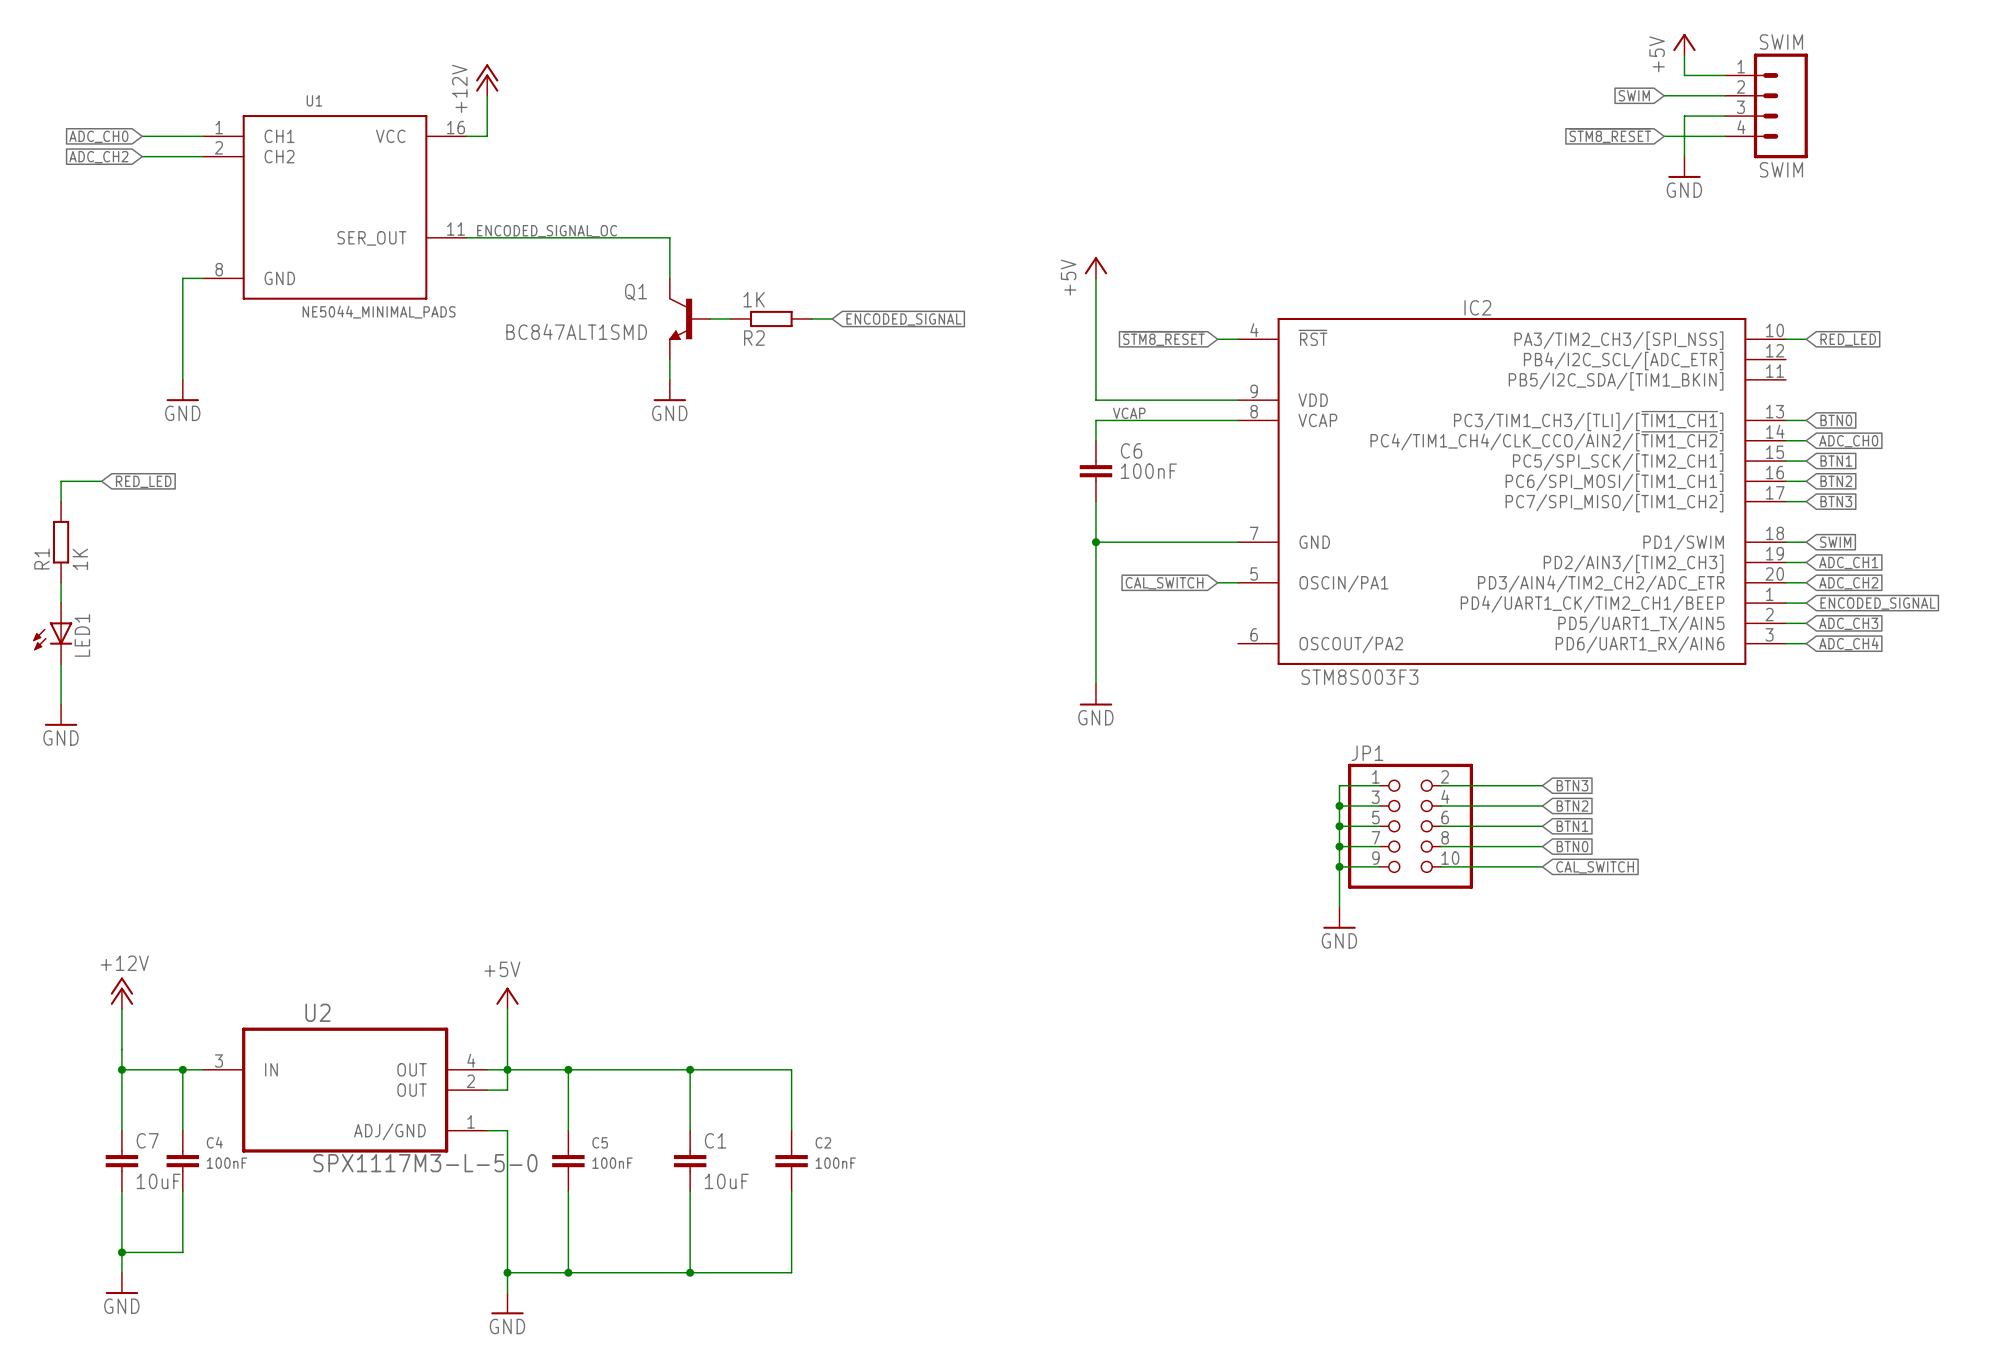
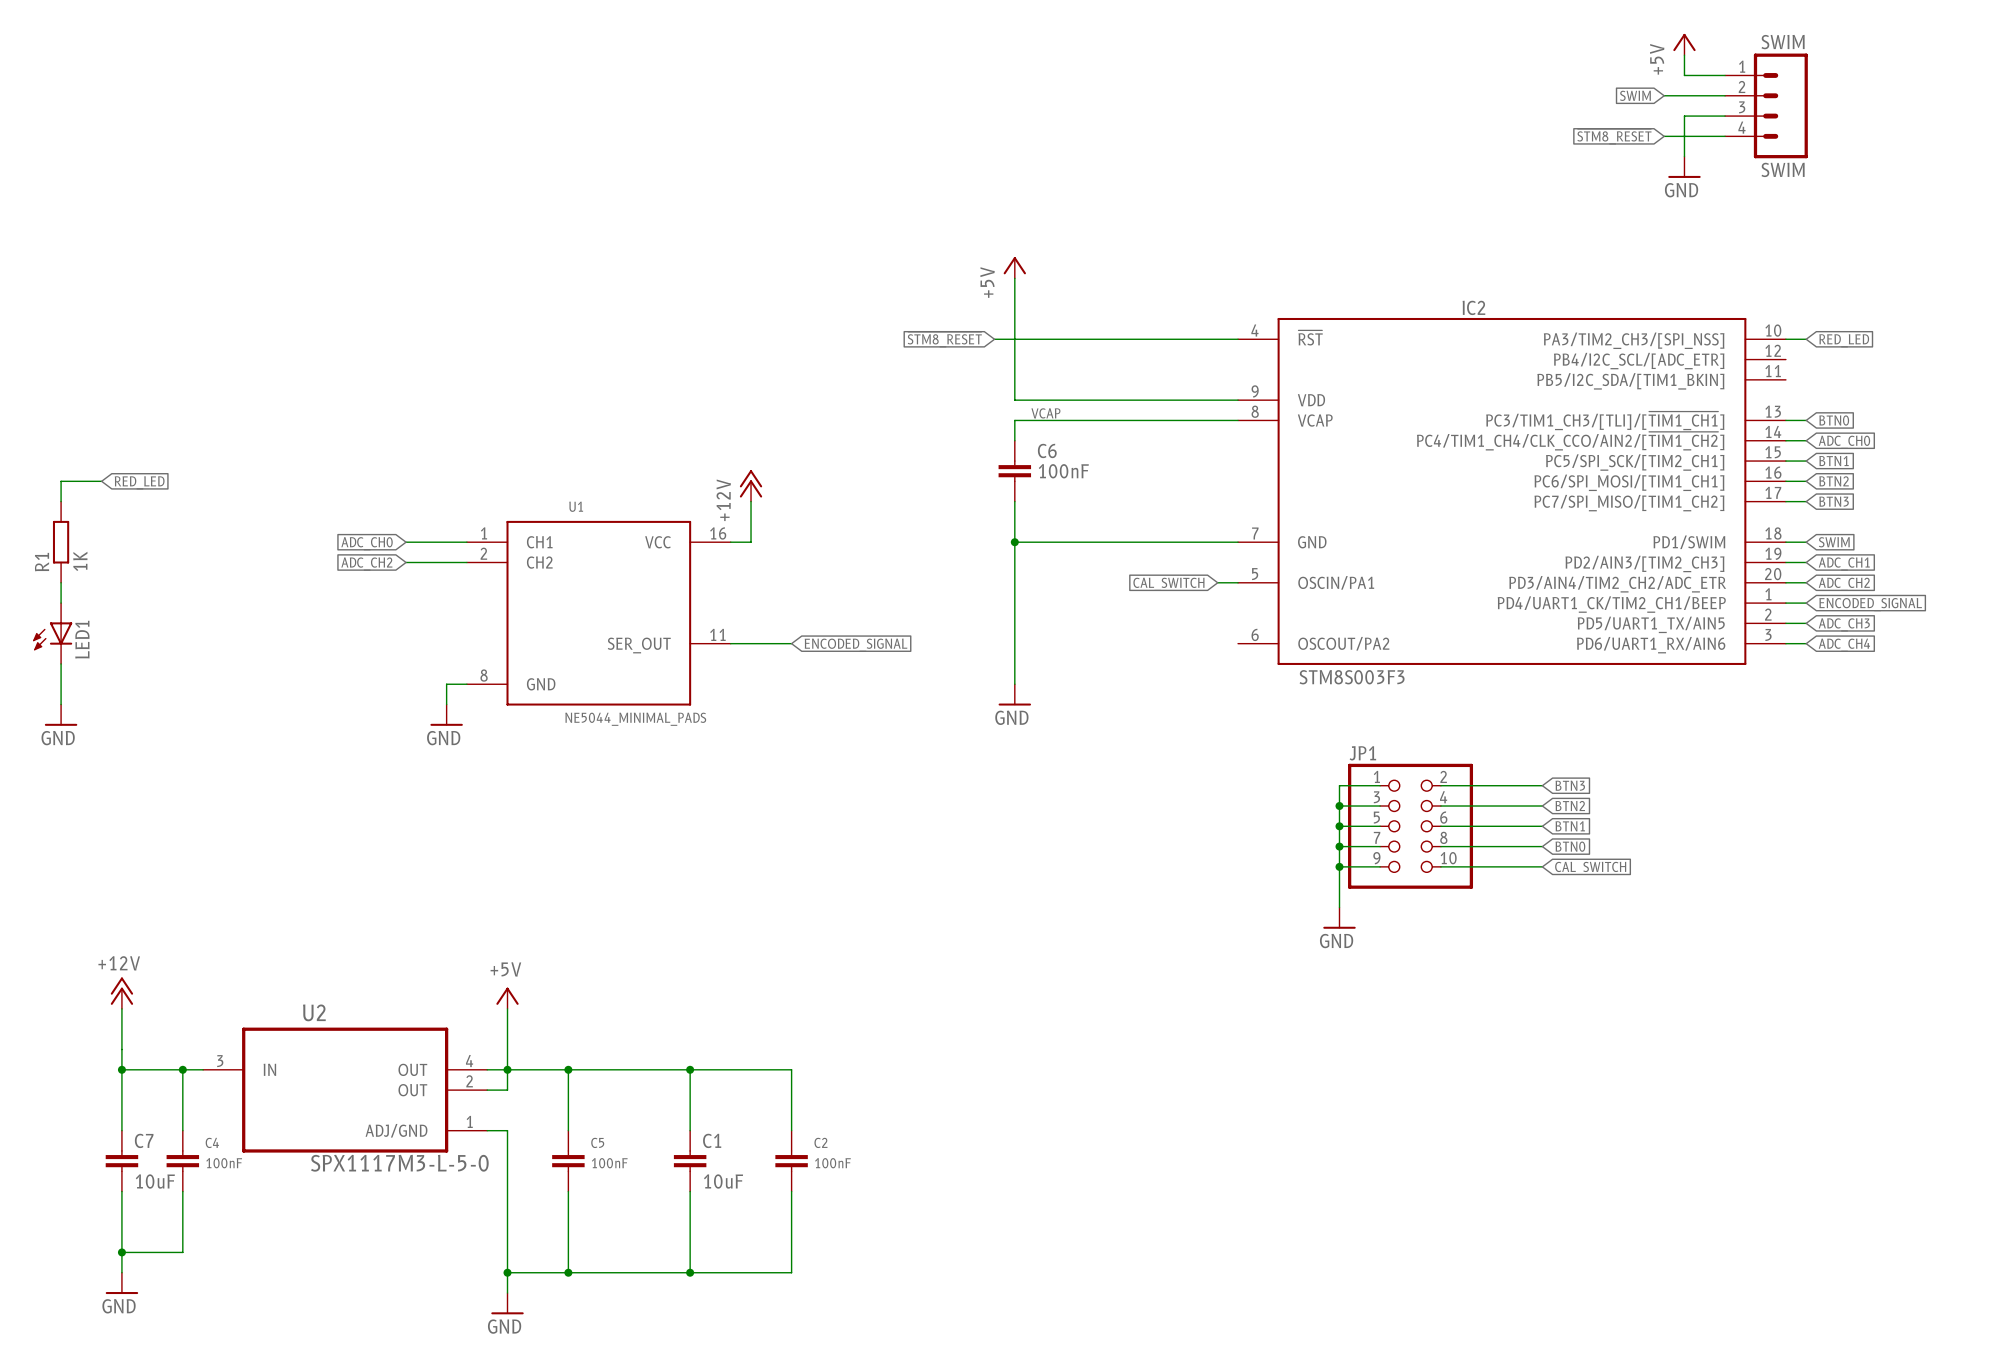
power symbol: +12V (487, 80) -> none
wire: (487, 95) (487, 136) (466, 136) -> none
global label: ADC_CH0 (98, 136) -> none
wire: (142, 136) (203, 136) -> none
wire: (142, 156) (203, 156) -> none
global label: ADC_CH2 (98, 157) -> none
U1 position: (335, 207) -> (598, 613)
label: ENCODED_SIGNAL_OC (547, 231) -> none
wire: (466, 237) (669, 237) (669, 278) -> none
power symbol position: +5V (1095, 267) -> +5V (1014, 267)
wire: (203, 278) (182, 278) (182, 379) -> none
wire: (1095, 278) (1095, 400) -> (1014, 278) (1014, 400) (1095, 400)
Q1: BC847ALT1SMD (689, 318) -> none
wire: (710, 318) (730, 318) -> none
R2: 1K (771, 318) -> none
wire: (811, 318) (832, 318) -> none
global label: ENCODED_SIGNAL (904, 319) -> none
global label: none -> ~{STM8_RESET} (944, 339)
global label: ~{STM8_RESET} (1163, 338) -> none
wire: none -> (994, 339) (1217, 339)
wire: (669, 359) (669, 379) -> none
power symbol: GND (182, 390) -> none
power symbol: GND (669, 390) -> none
label position: VCAP (1129, 413) -> VCAP (1045, 413)
wire: (1095, 420) (1095, 440) -> (1095, 420) (1014, 420) (1014, 440)
C6 position: (1095, 471) -> (1014, 471)
power symbol: none -> +12V (751, 485)
wire: none -> (751, 501) (751, 542) (730, 542)
wire: (1095, 501) (1095, 684) -> (1014, 501) (1014, 684)
global label: none -> ADC_CH0 (367, 543)
wire: none -> (406, 542) (466, 542)
wire: none -> (1014, 542) (1095, 542)
junction: none -> (1014, 542)
junction: (1095, 542) -> none
global label: none -> ADC_CH2 (366, 564)
wire: none -> (406, 562) (466, 562)
wire: none -> (730, 643) (791, 643)
global label: none -> ENCODED_SIGNAL (856, 645)
wire: none -> (466, 684) (446, 684) (446, 704)
power symbol position: GND (1095, 694) -> GND (1014, 694)
power symbol: none -> GND (446, 715)

